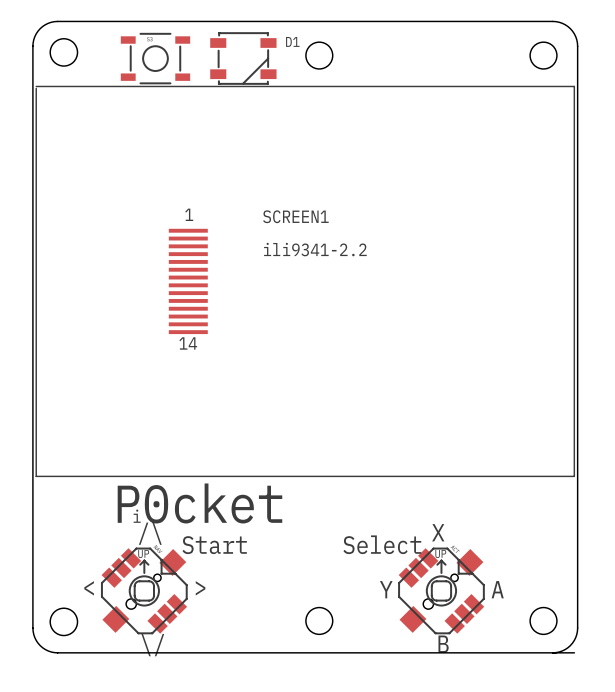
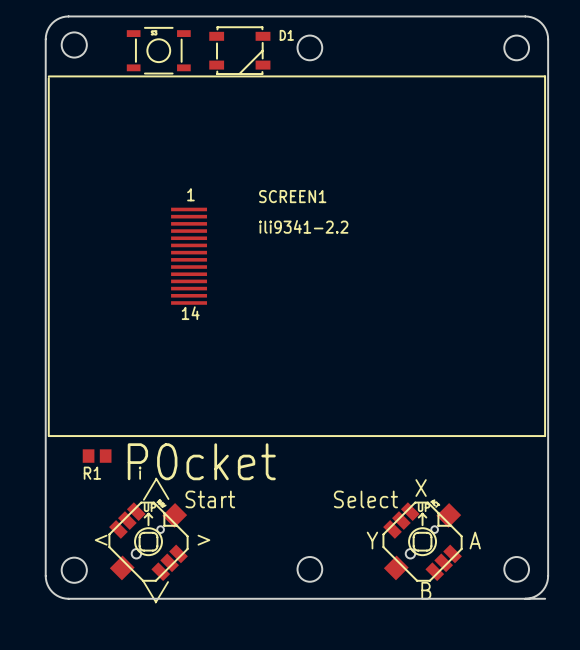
R1: none -> (97, 456)

